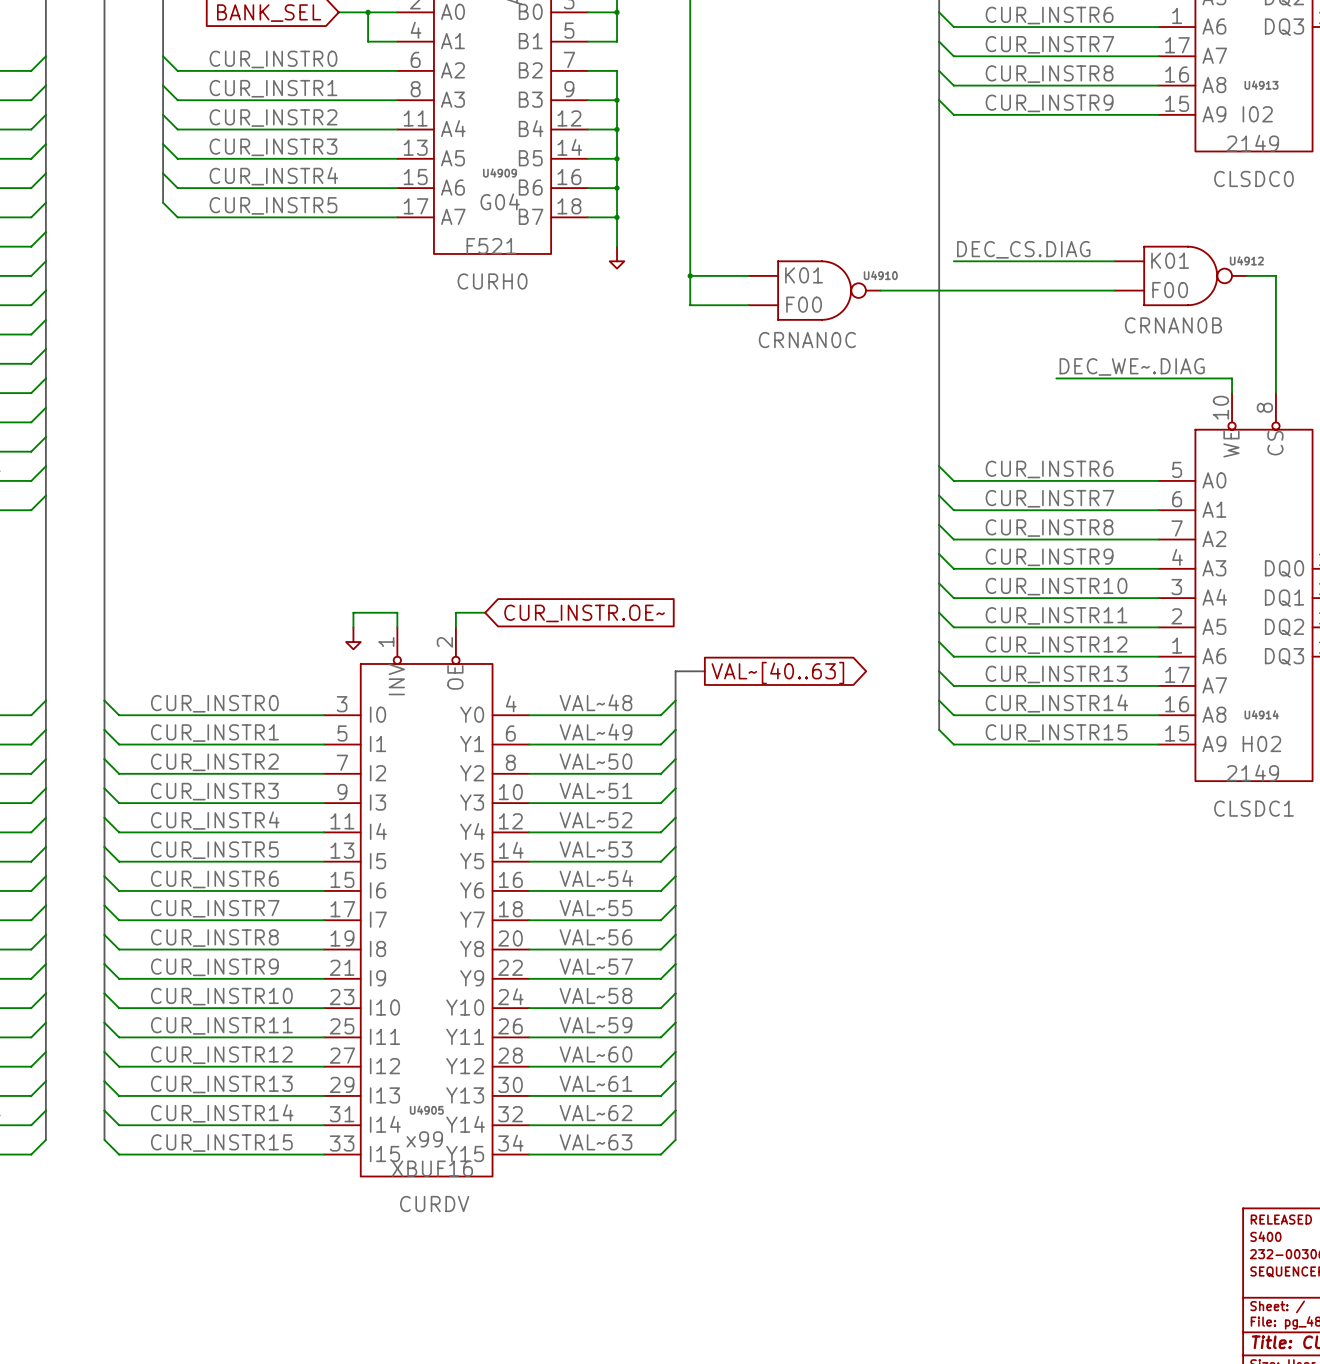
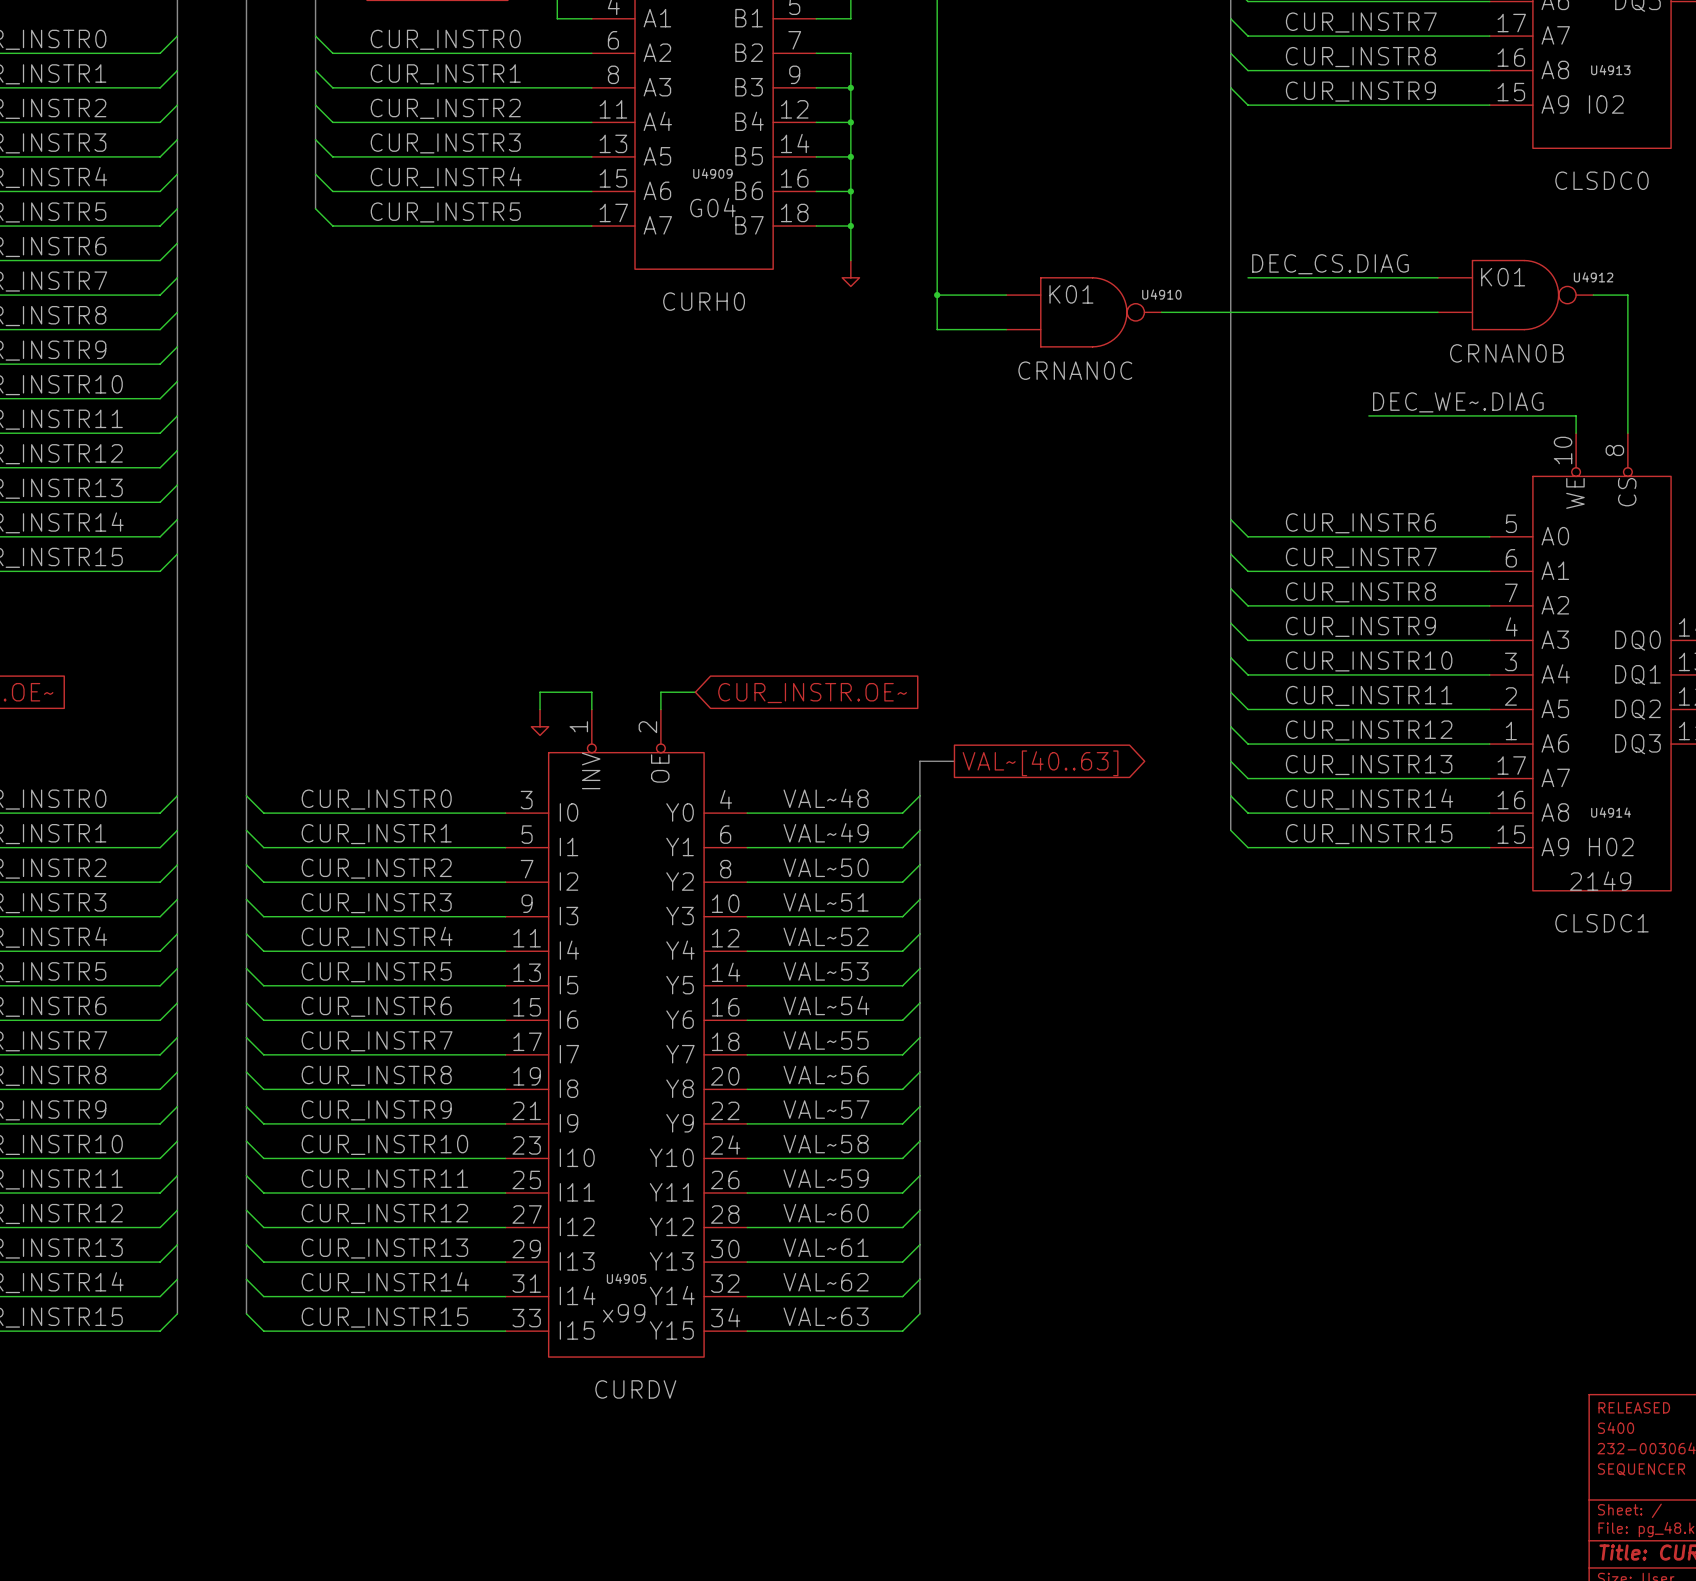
U4913 value: 2149 (1252, 143) -> none
U4909 value: F521 (491, 246) -> none
U4912 value: F00 (1170, 290) -> none
U4910 value: F00 (804, 304) -> none
U4905 value: XBUF16 (432, 1168) -> none

